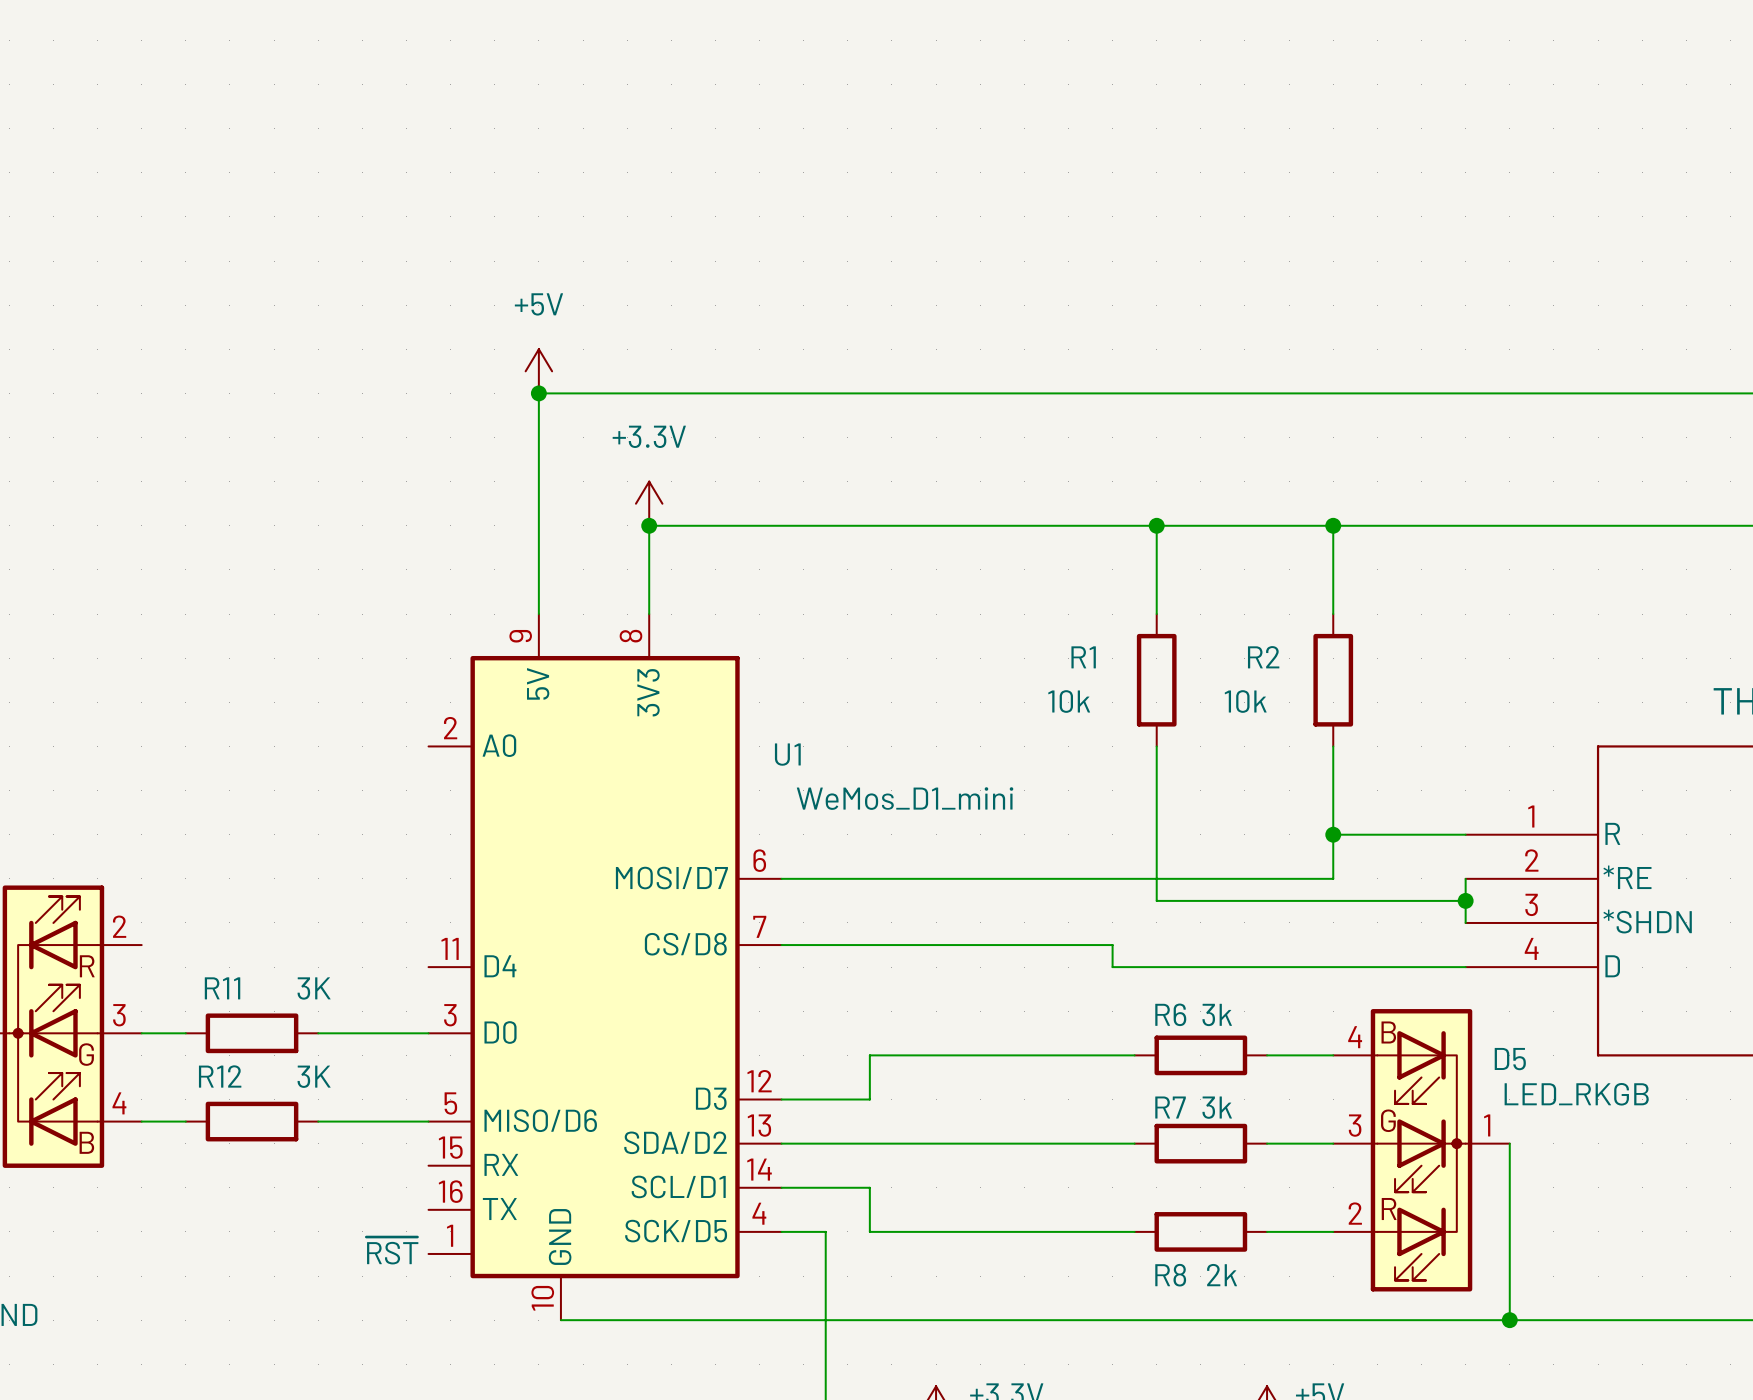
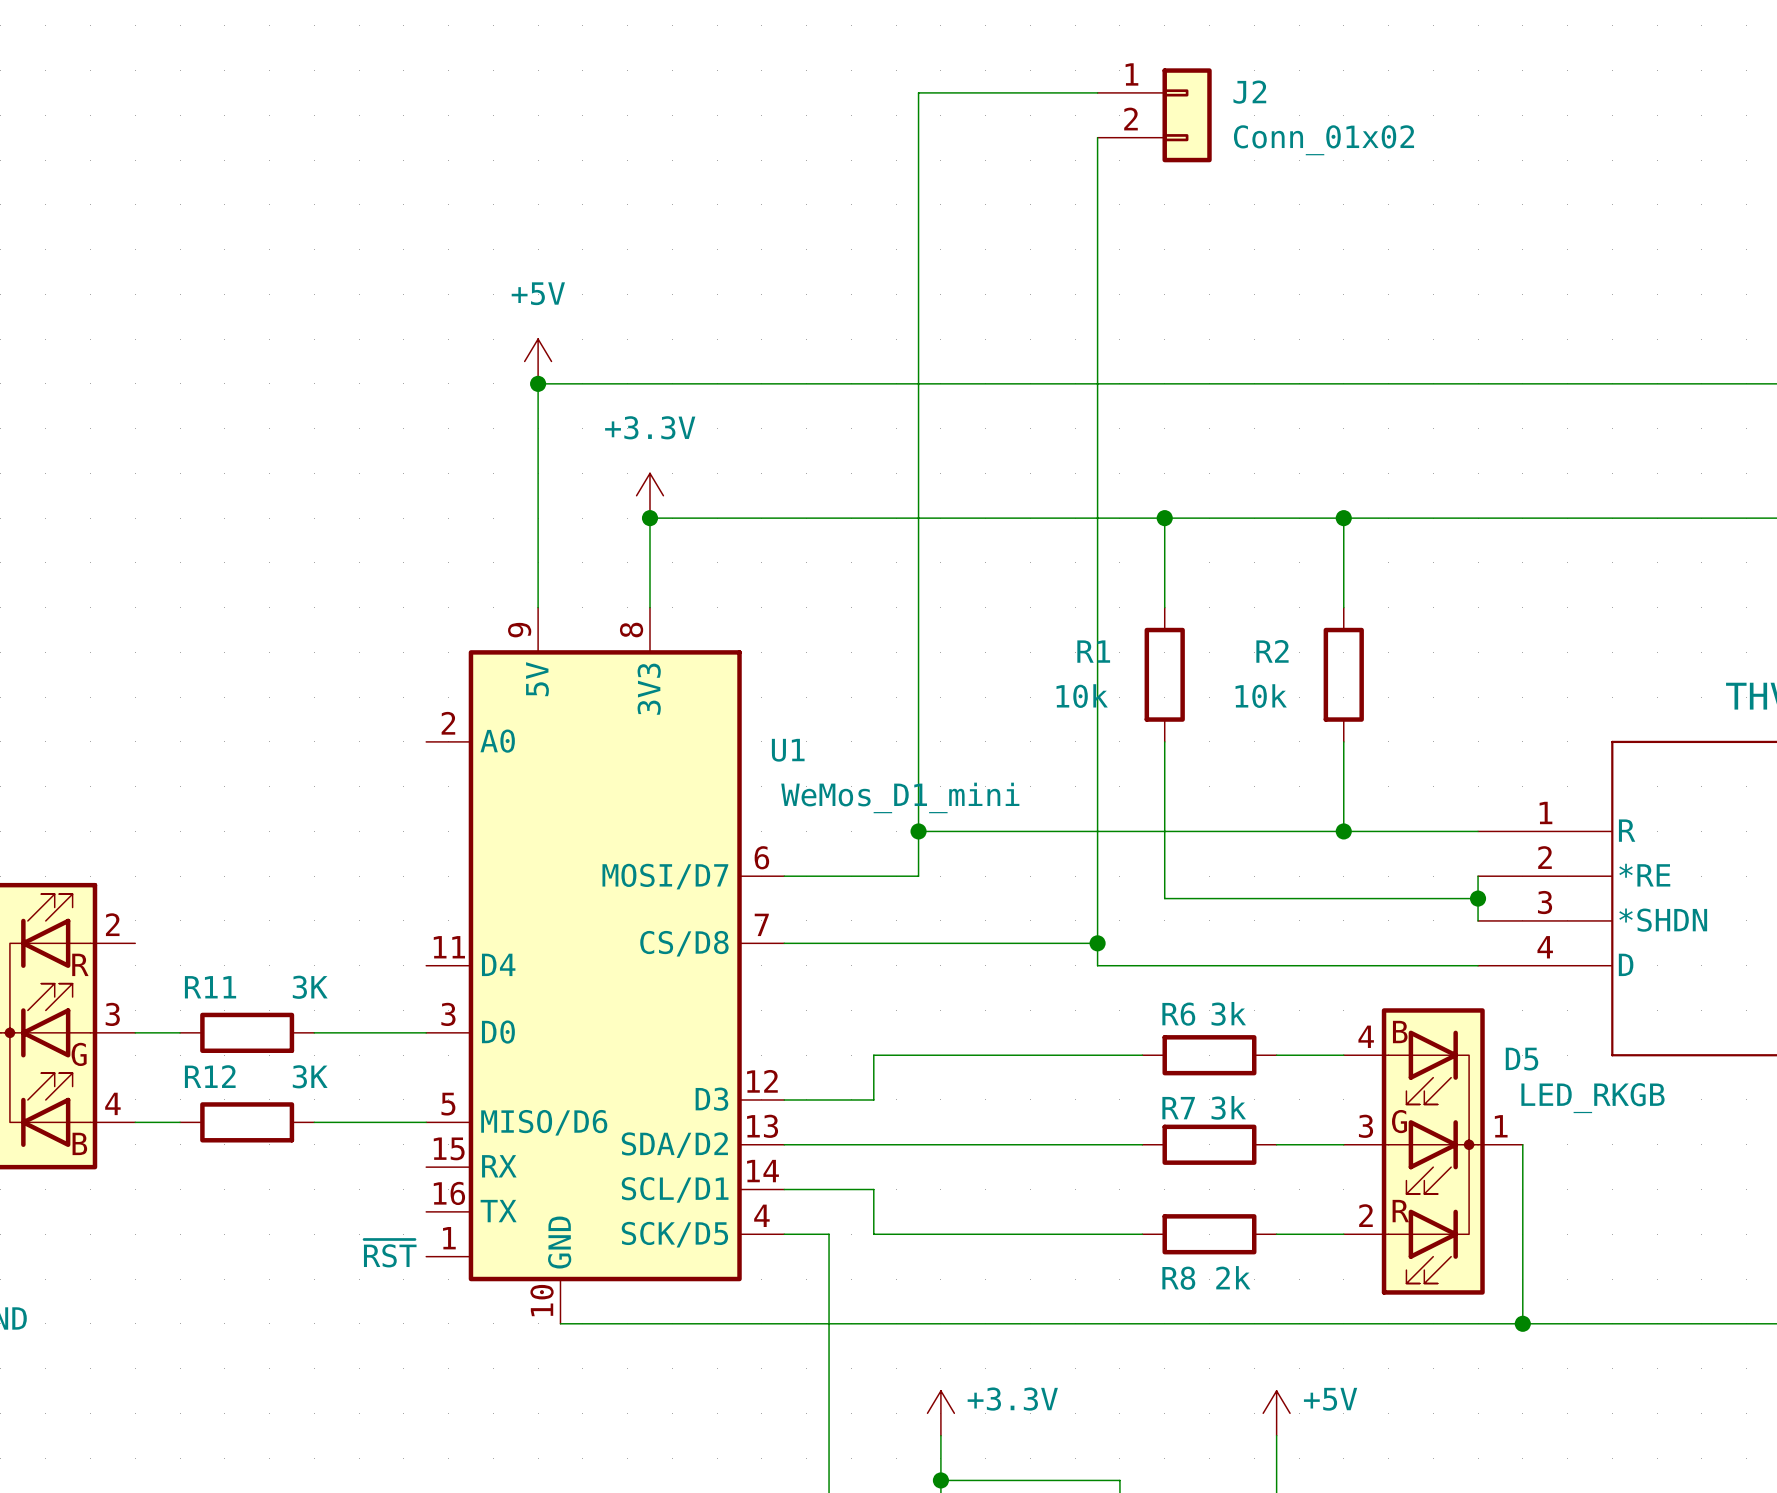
wire: none -> (1097, 92) (918, 92) (918, 876)
J2: none -> Conn_01x02 (1154, 115)
junction: none -> (918, 831)
wire: (1333, 834) (1333, 878) (914, 878) -> (1343, 831) (918, 831)
wire: (1090, 945) (1112, 945) (1112, 967) -> (1097, 137) (1097, 965) (1119, 965)
junction: none -> (1097, 943)

